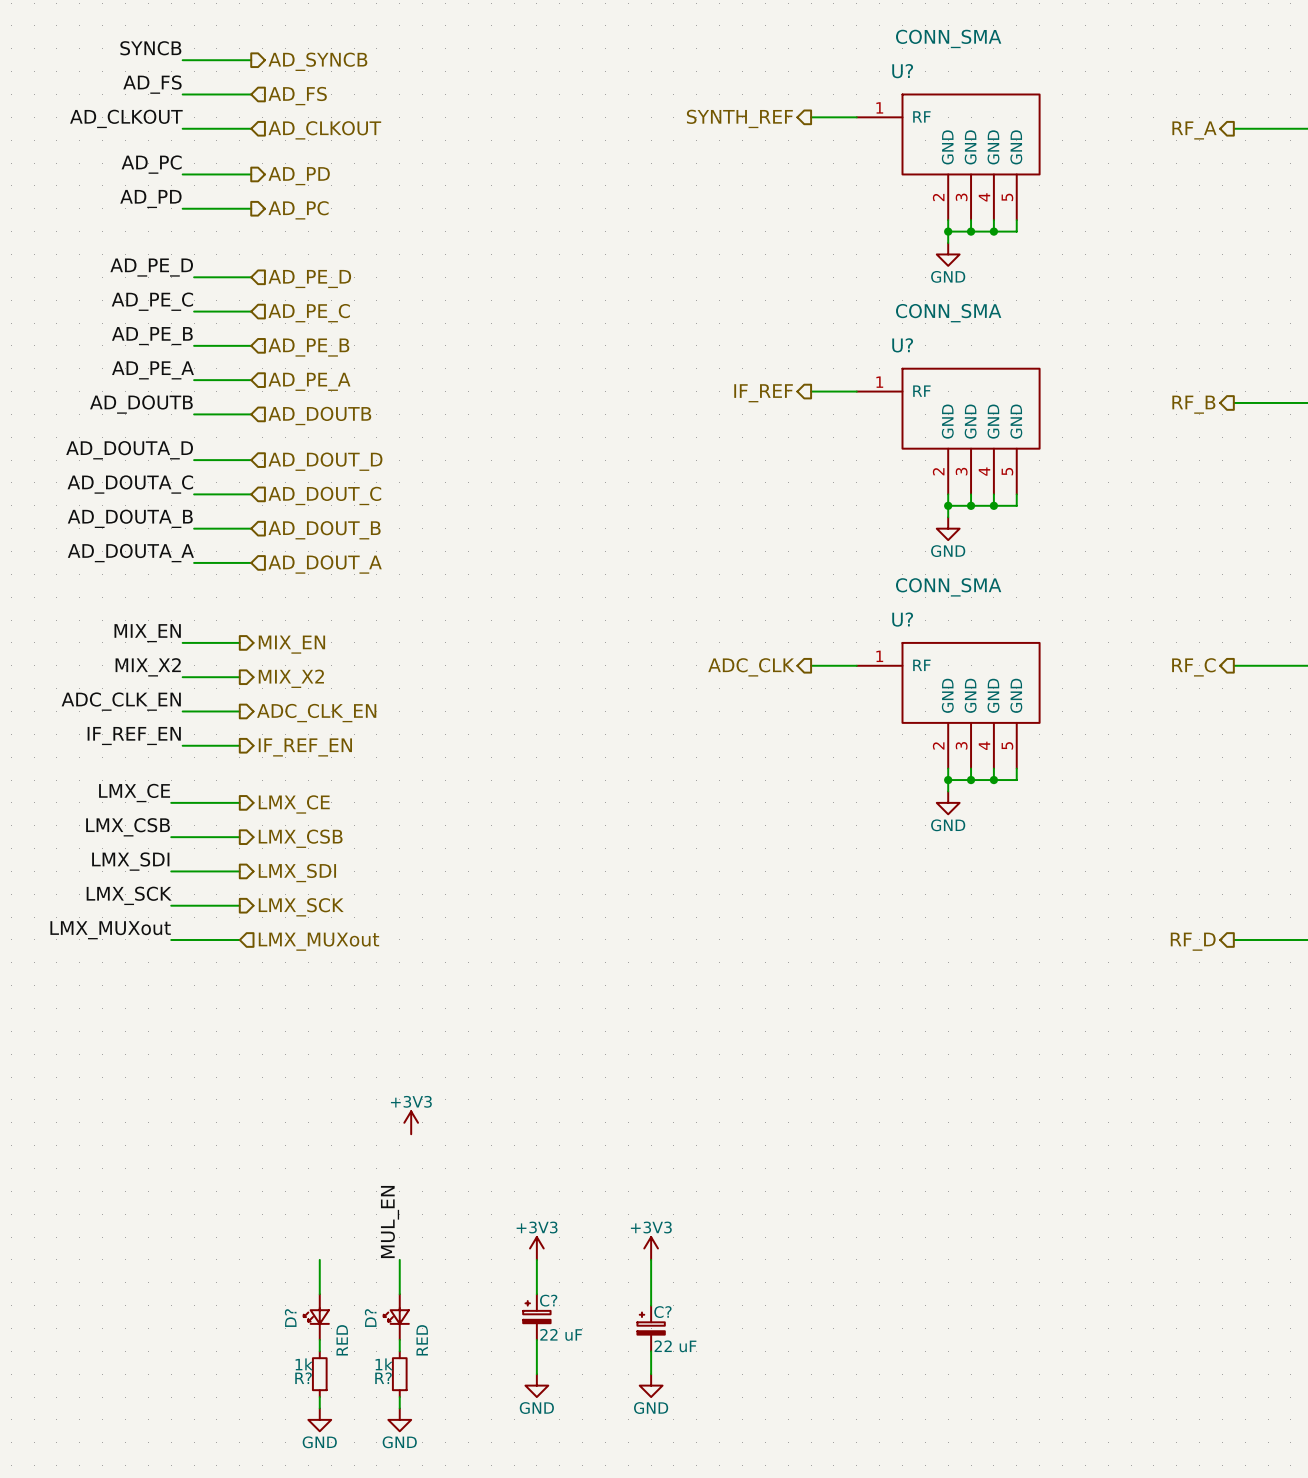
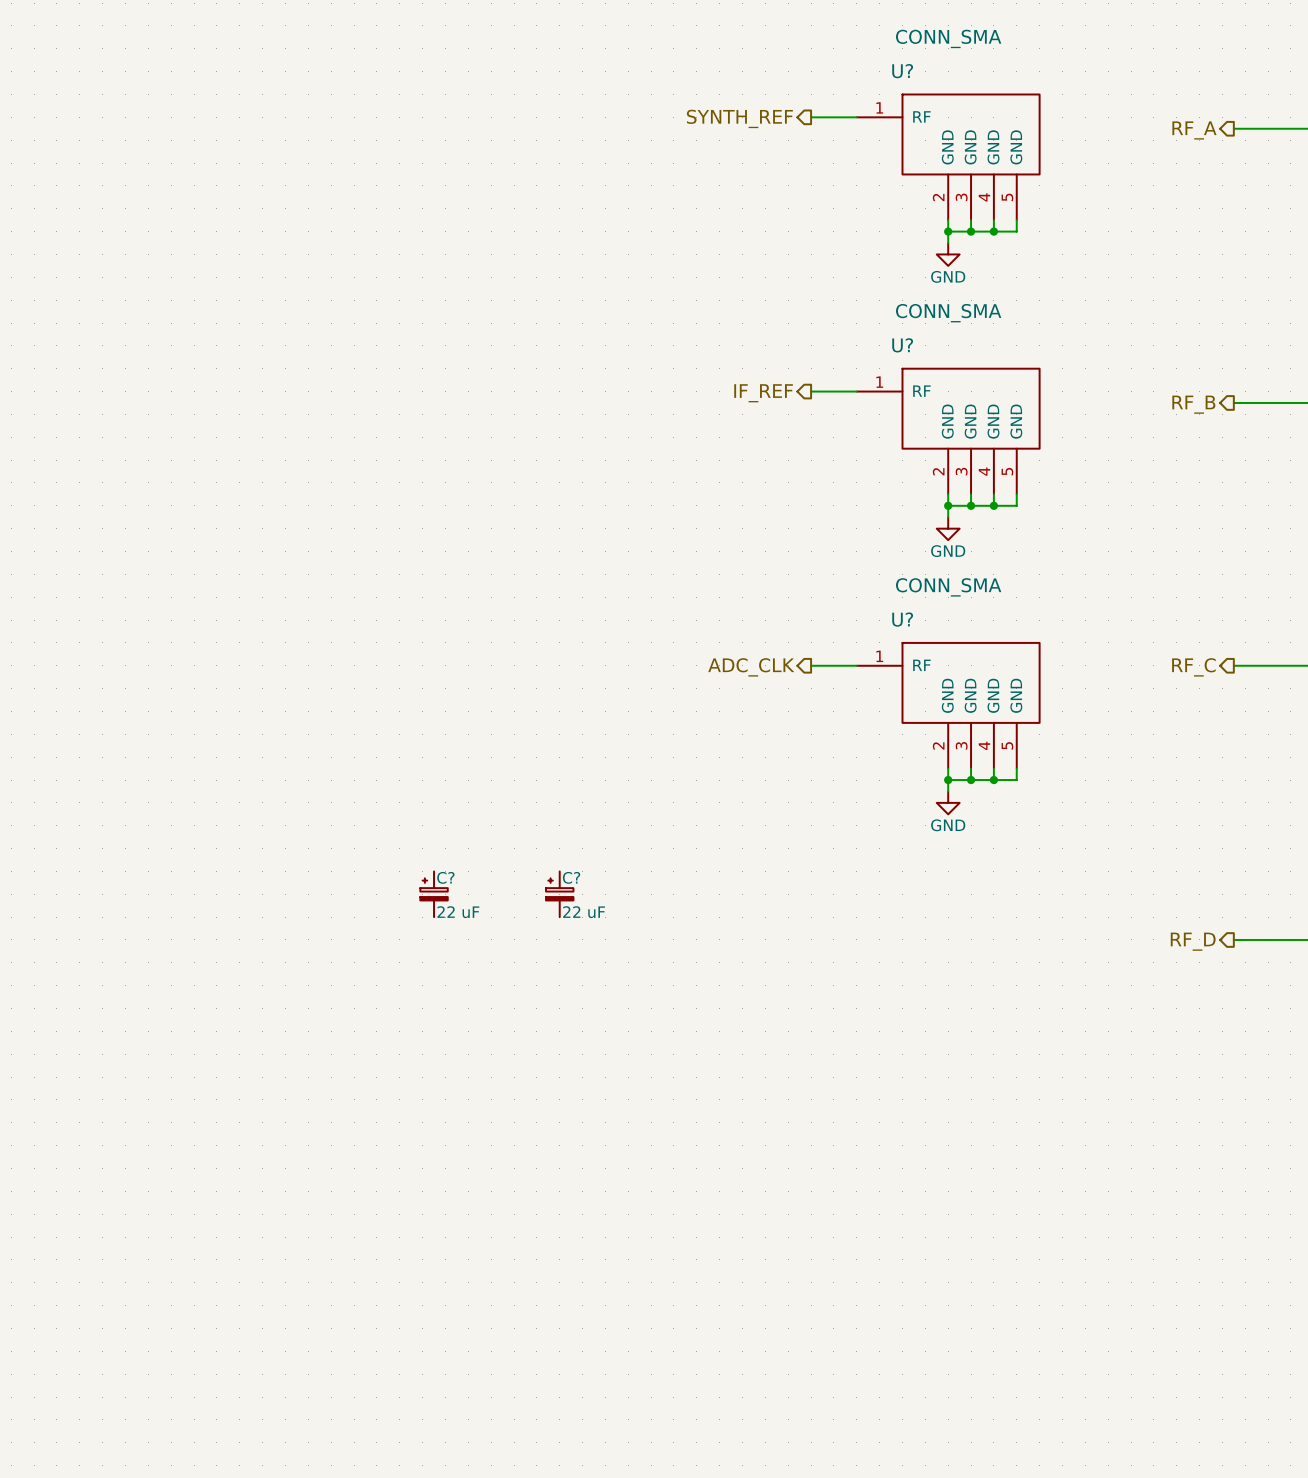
label: SYNCB (150, 48) -> none
wire: (182, 60) (251, 60) -> none
hierarchical label: AD_SYNCB (317, 61) -> none
label: AD_FS (152, 84) -> none
wire: (182, 94) (251, 94) -> none
hierarchical label: AD_FS (297, 96) -> none
label: AD_CLKOUT (126, 118) -> none
wire: (182, 128) (251, 128) -> none
hierarchical label: AD_CLKOUT (324, 130) -> none
label: AD_PC (151, 164) -> none
wire: (182, 174) (251, 174) -> none
hierarchical label: AD_PD (299, 176) -> none
label: AD_PD (150, 199) -> none
wire: (182, 208) (251, 208) -> none
hierarchical label: AD_PC (298, 210) -> none
label: AD_PE_D (151, 267) -> none
wire: (194, 277) (251, 277) -> none
hierarchical label: AD_PE_D (309, 279) -> none
label: AD_PE_C (152, 301) -> none
wire: (194, 311) (251, 311) -> none
hierarchical label: AD_PE_C (309, 313) -> none
label: AD_PE_B (152, 336) -> none
wire: (194, 345) (251, 345) -> none
hierarchical label: AD_PE_B (308, 347) -> none
label: AD_PE_A (152, 370) -> none
wire: (194, 380) (251, 380) -> none
hierarchical label: AD_PE_A (309, 381) -> none
label: AD_DOUTB (141, 404) -> none
wire: (194, 414) (251, 414) -> none
hierarchical label: AD_DOUTB (319, 415) -> none
label: AD_DOUTA_D (129, 450) -> none
wire: (194, 460) (251, 460) -> none
hierarchical label: AD_DOUT_D (325, 461) -> none
label: AD_DOUTA_C (130, 484) -> none
wire: (194, 494) (251, 494) -> none
hierarchical label: AD_DOUT_C (324, 495) -> none
label: AD_DOUTA_B (130, 518) -> none
wire: (194, 528) (251, 528) -> none
hierarchical label: AD_DOUT_B (324, 530) -> none
label: AD_DOUTA_A (130, 553) -> none
wire: (194, 562) (251, 562) -> none
hierarchical label: AD_DOUT_A (325, 564) -> none
label: MIX_EN (147, 633) -> none
wire: (182, 642) (239, 642) -> none
hierarchical label: MIX_EN (291, 644) -> none
label: MIX_X2 (148, 667) -> none
wire: (182, 677) (239, 677) -> none
hierarchical label: MIX_X2 (291, 678) -> none
label: ADC_CLK_EN (121, 701) -> none
wire: (182, 711) (239, 711) -> none
hierarchical label: ADC_CLK_EN (316, 713) -> none
label: IF_REF_EN (134, 736) -> none
wire: (182, 745) (239, 745) -> none
hierarchical label: IF_REF_EN (305, 747) -> none
label: LMX_CE (134, 793) -> none
wire: (171, 802) (239, 802) -> none
hierarchical label: LMX_CE (294, 804) -> none
label: LMX_CSB (128, 827) -> none
wire: (171, 837) (239, 837) -> none
hierarchical label: LMX_CSB (300, 838) -> none
label: LMX_SDI (130, 861) -> none
wire: (171, 871) (239, 871) -> none
hierarchical label: LMX_SDI (297, 873) -> none
C?: none -> 22 uF (434, 894)
C?: none -> 22 uF (559, 894)
label: LMX_SCK (129, 895) -> none
wire: (171, 905) (239, 905) -> none
hierarchical label: LMX_SCK (301, 907) -> none
label: LMX_MUXout (110, 930) -> none
wire: (171, 939) (239, 939) -> none
hierarchical label: LMX_MUXout (318, 941) -> none
power symbol: +3V3 (411, 1122) -> none
label: MUL_EN (390, 1222) -> none
power symbol: +3V3 (536, 1248) -> none
power symbol: +3V3 (651, 1248) -> none
wire: (319, 1259) (319, 1294) -> none
wire: (399, 1259) (399, 1294) -> none
wire: (536, 1259) (536, 1294) -> none
wire: (651, 1259) (651, 1305) -> none
D?: RED (316, 1317) -> none
D?: RED (396, 1317) -> none
C?: 22 uF (536, 1317) -> none
C?: 22 uF (651, 1328) -> none
wire: (319, 1339) (319, 1351) -> none
wire: (399, 1339) (399, 1351) -> none
wire: (536, 1339) (536, 1374) -> none
wire: (651, 1351) (651, 1374) -> none
R?: 1k (319, 1374) -> none
R?: 1k (399, 1374) -> none
power symbol: GND (536, 1385) -> none
power symbol: GND (651, 1385) -> none
wire: (319, 1397) (319, 1408) -> none
wire: (399, 1397) (399, 1408) -> none
power symbol: GND (319, 1419) -> none
power symbol: GND (399, 1419) -> none

